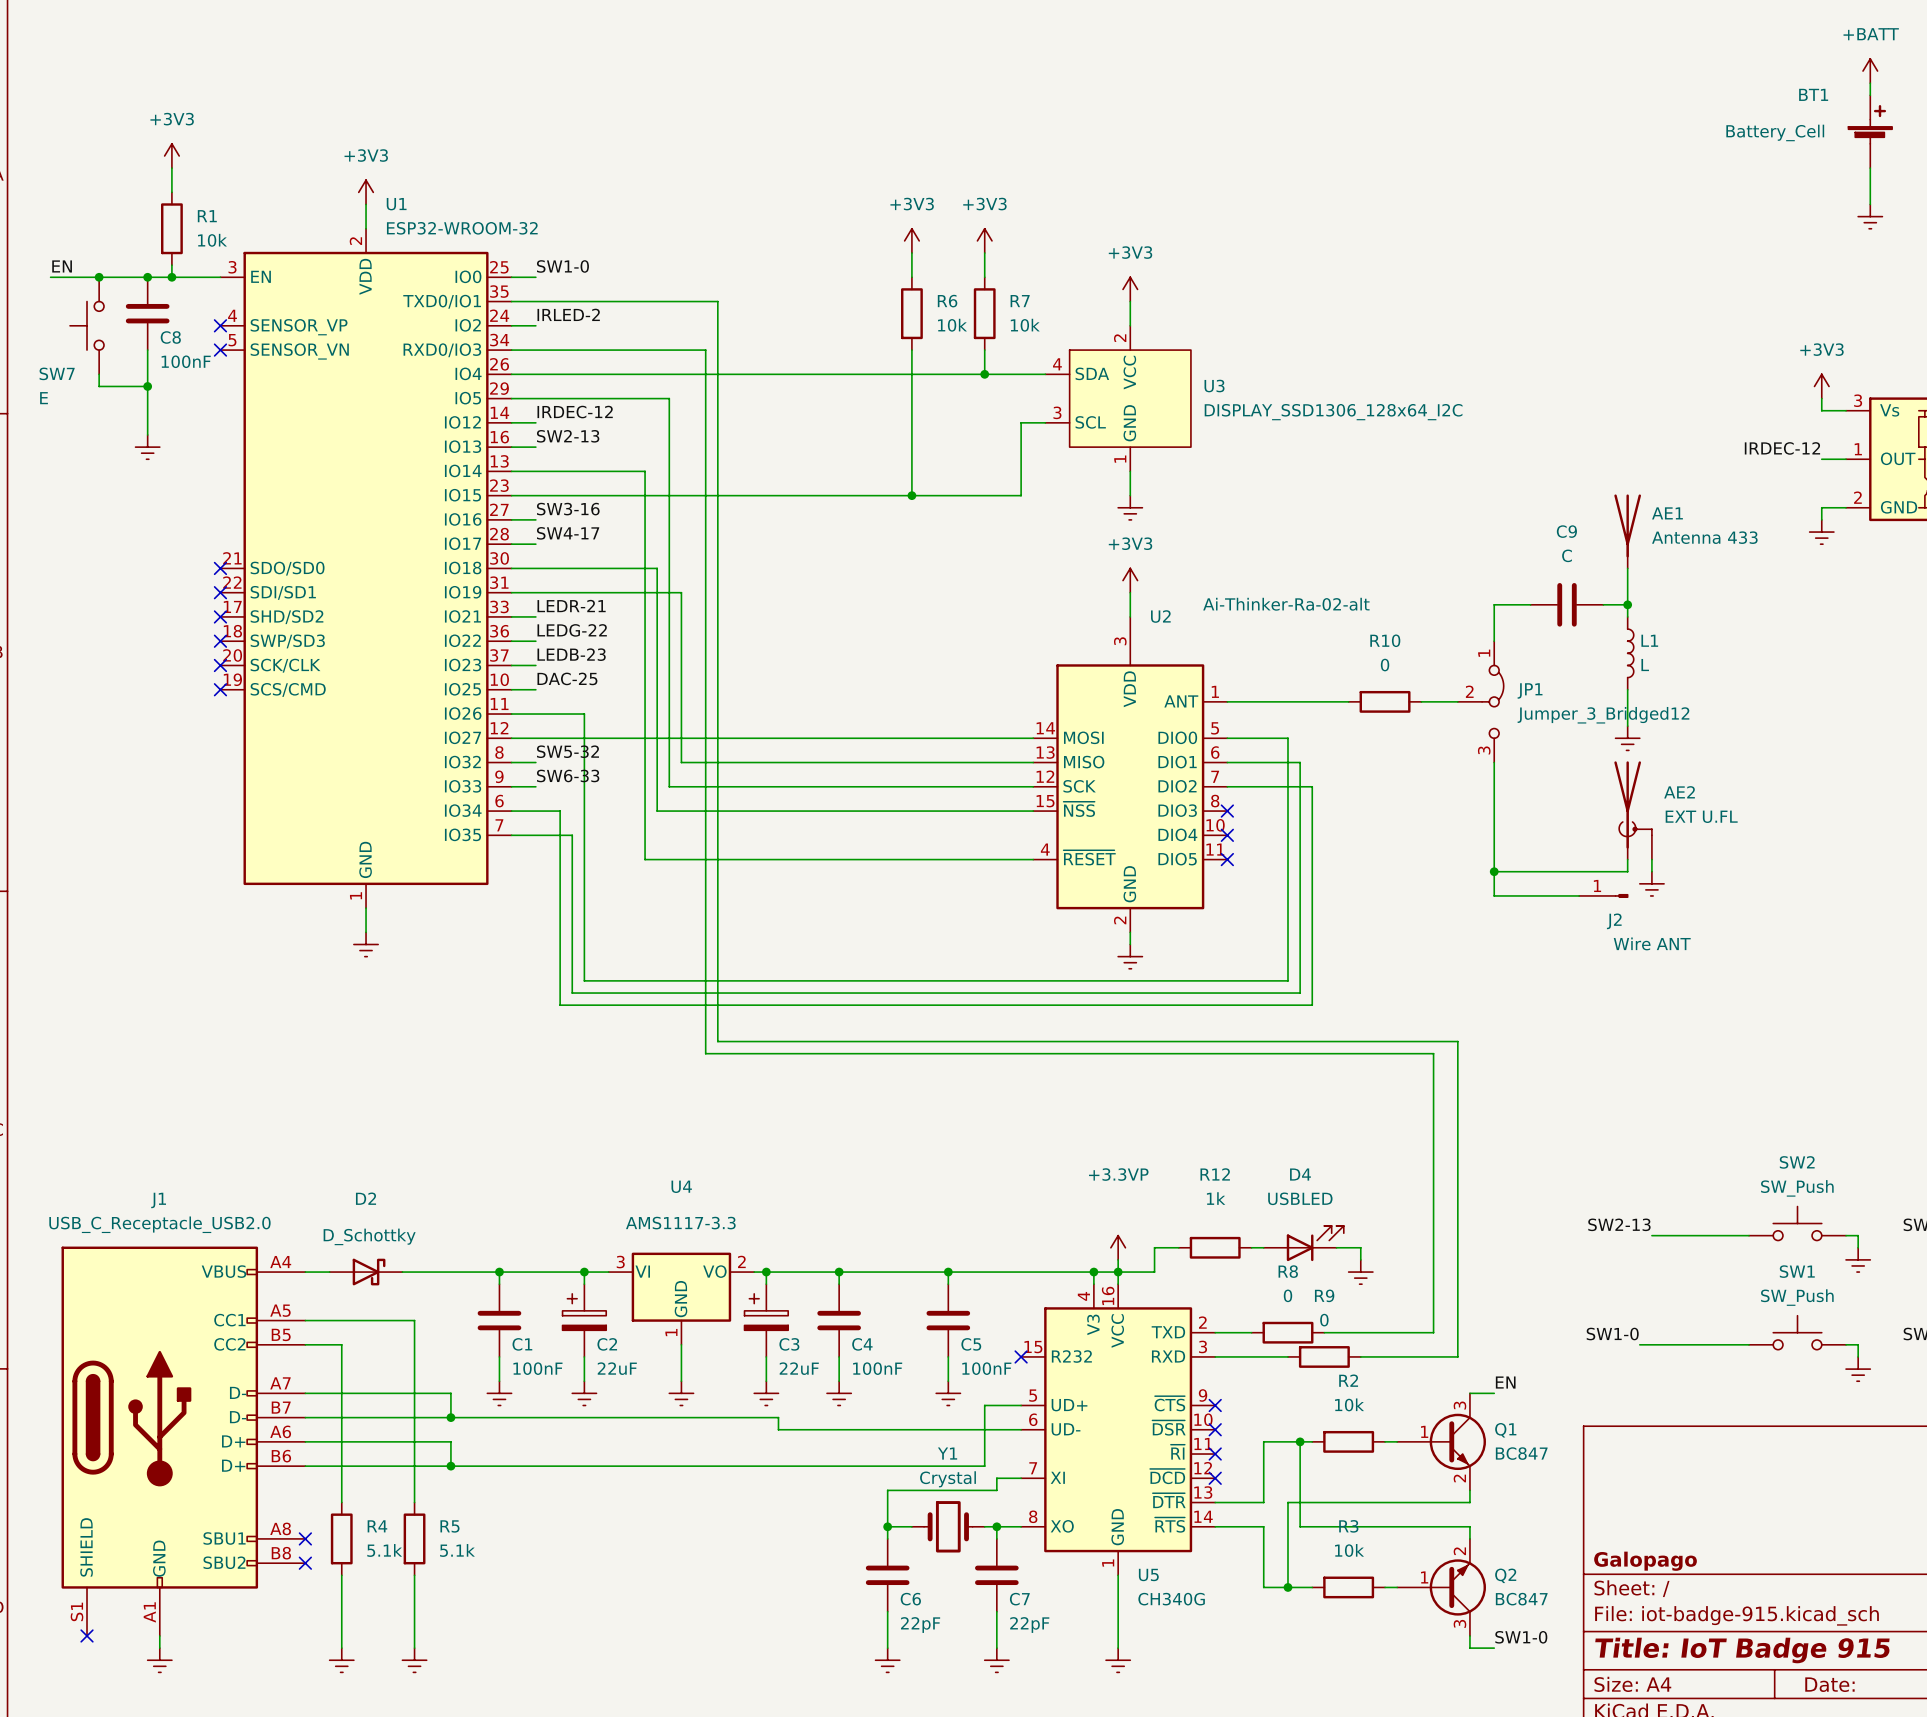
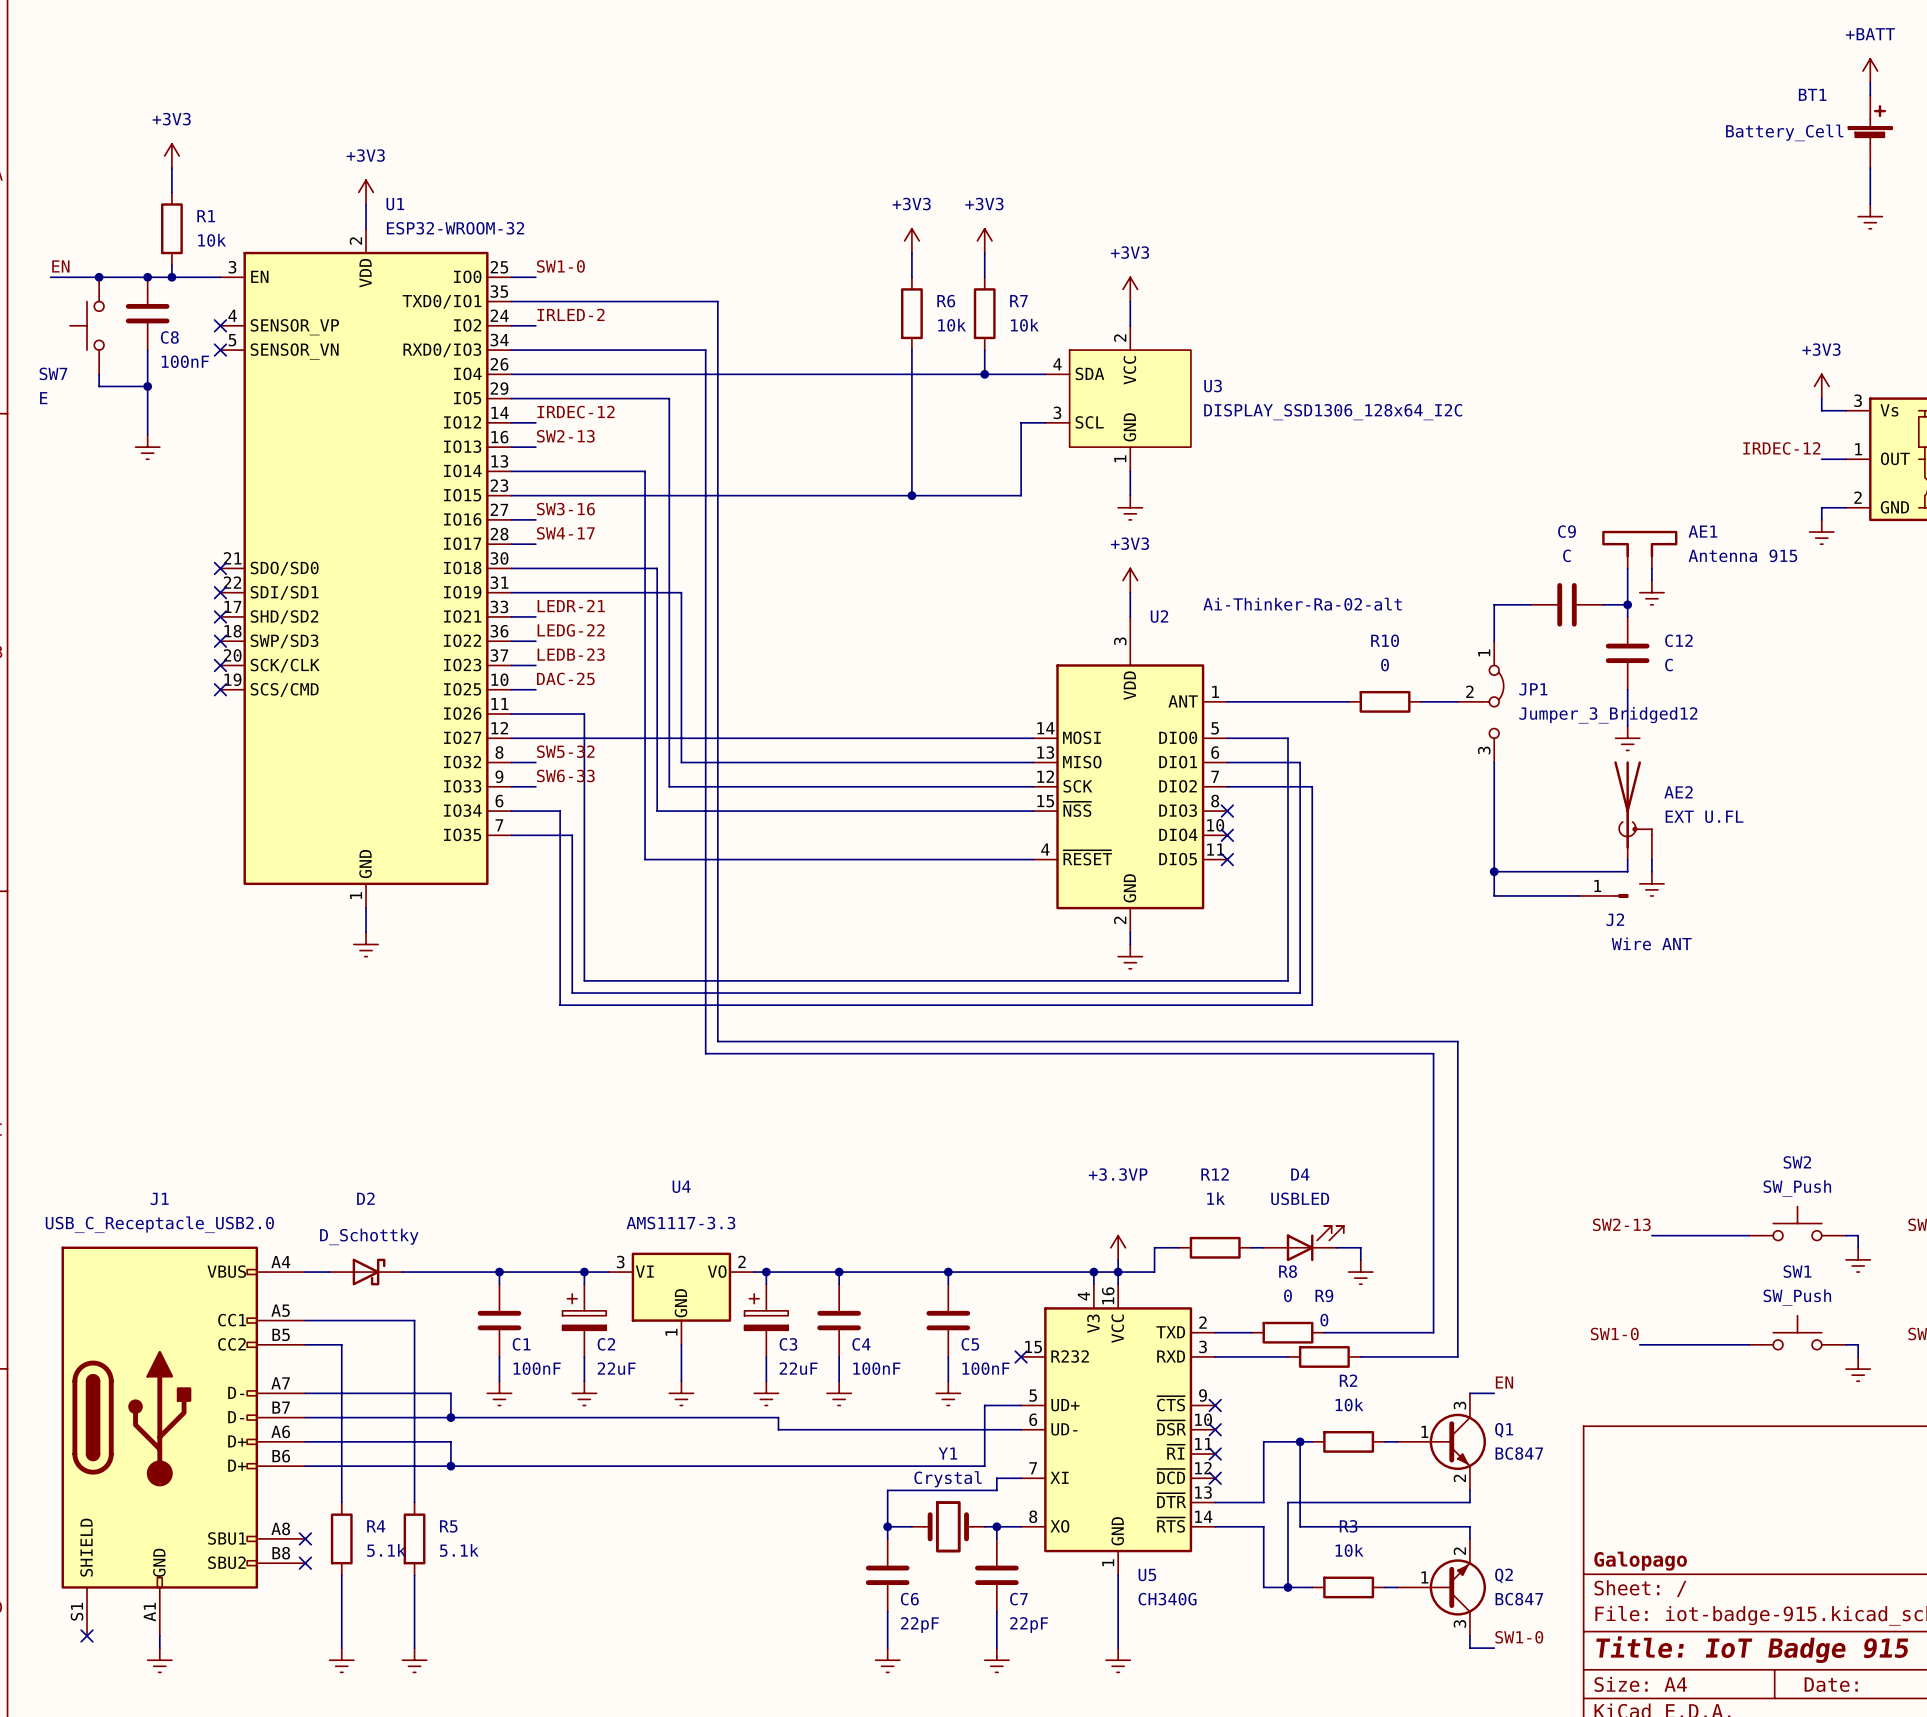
AE1 symbol: [1614, 494, 1642, 569] -> [1602, 530, 1678, 569]
AE1 name position: AE1 (1667, 513) -> AE1 (1702, 531)
AE1 value: Antenna 433 (1704, 537) -> Antenna 915 (1742, 555)
wire: none -> (1651, 568) (1651, 580)
power symbol: none -> (1651, 592)
C12: none -> C (1627, 653)
L1: L (1630, 653) -> none

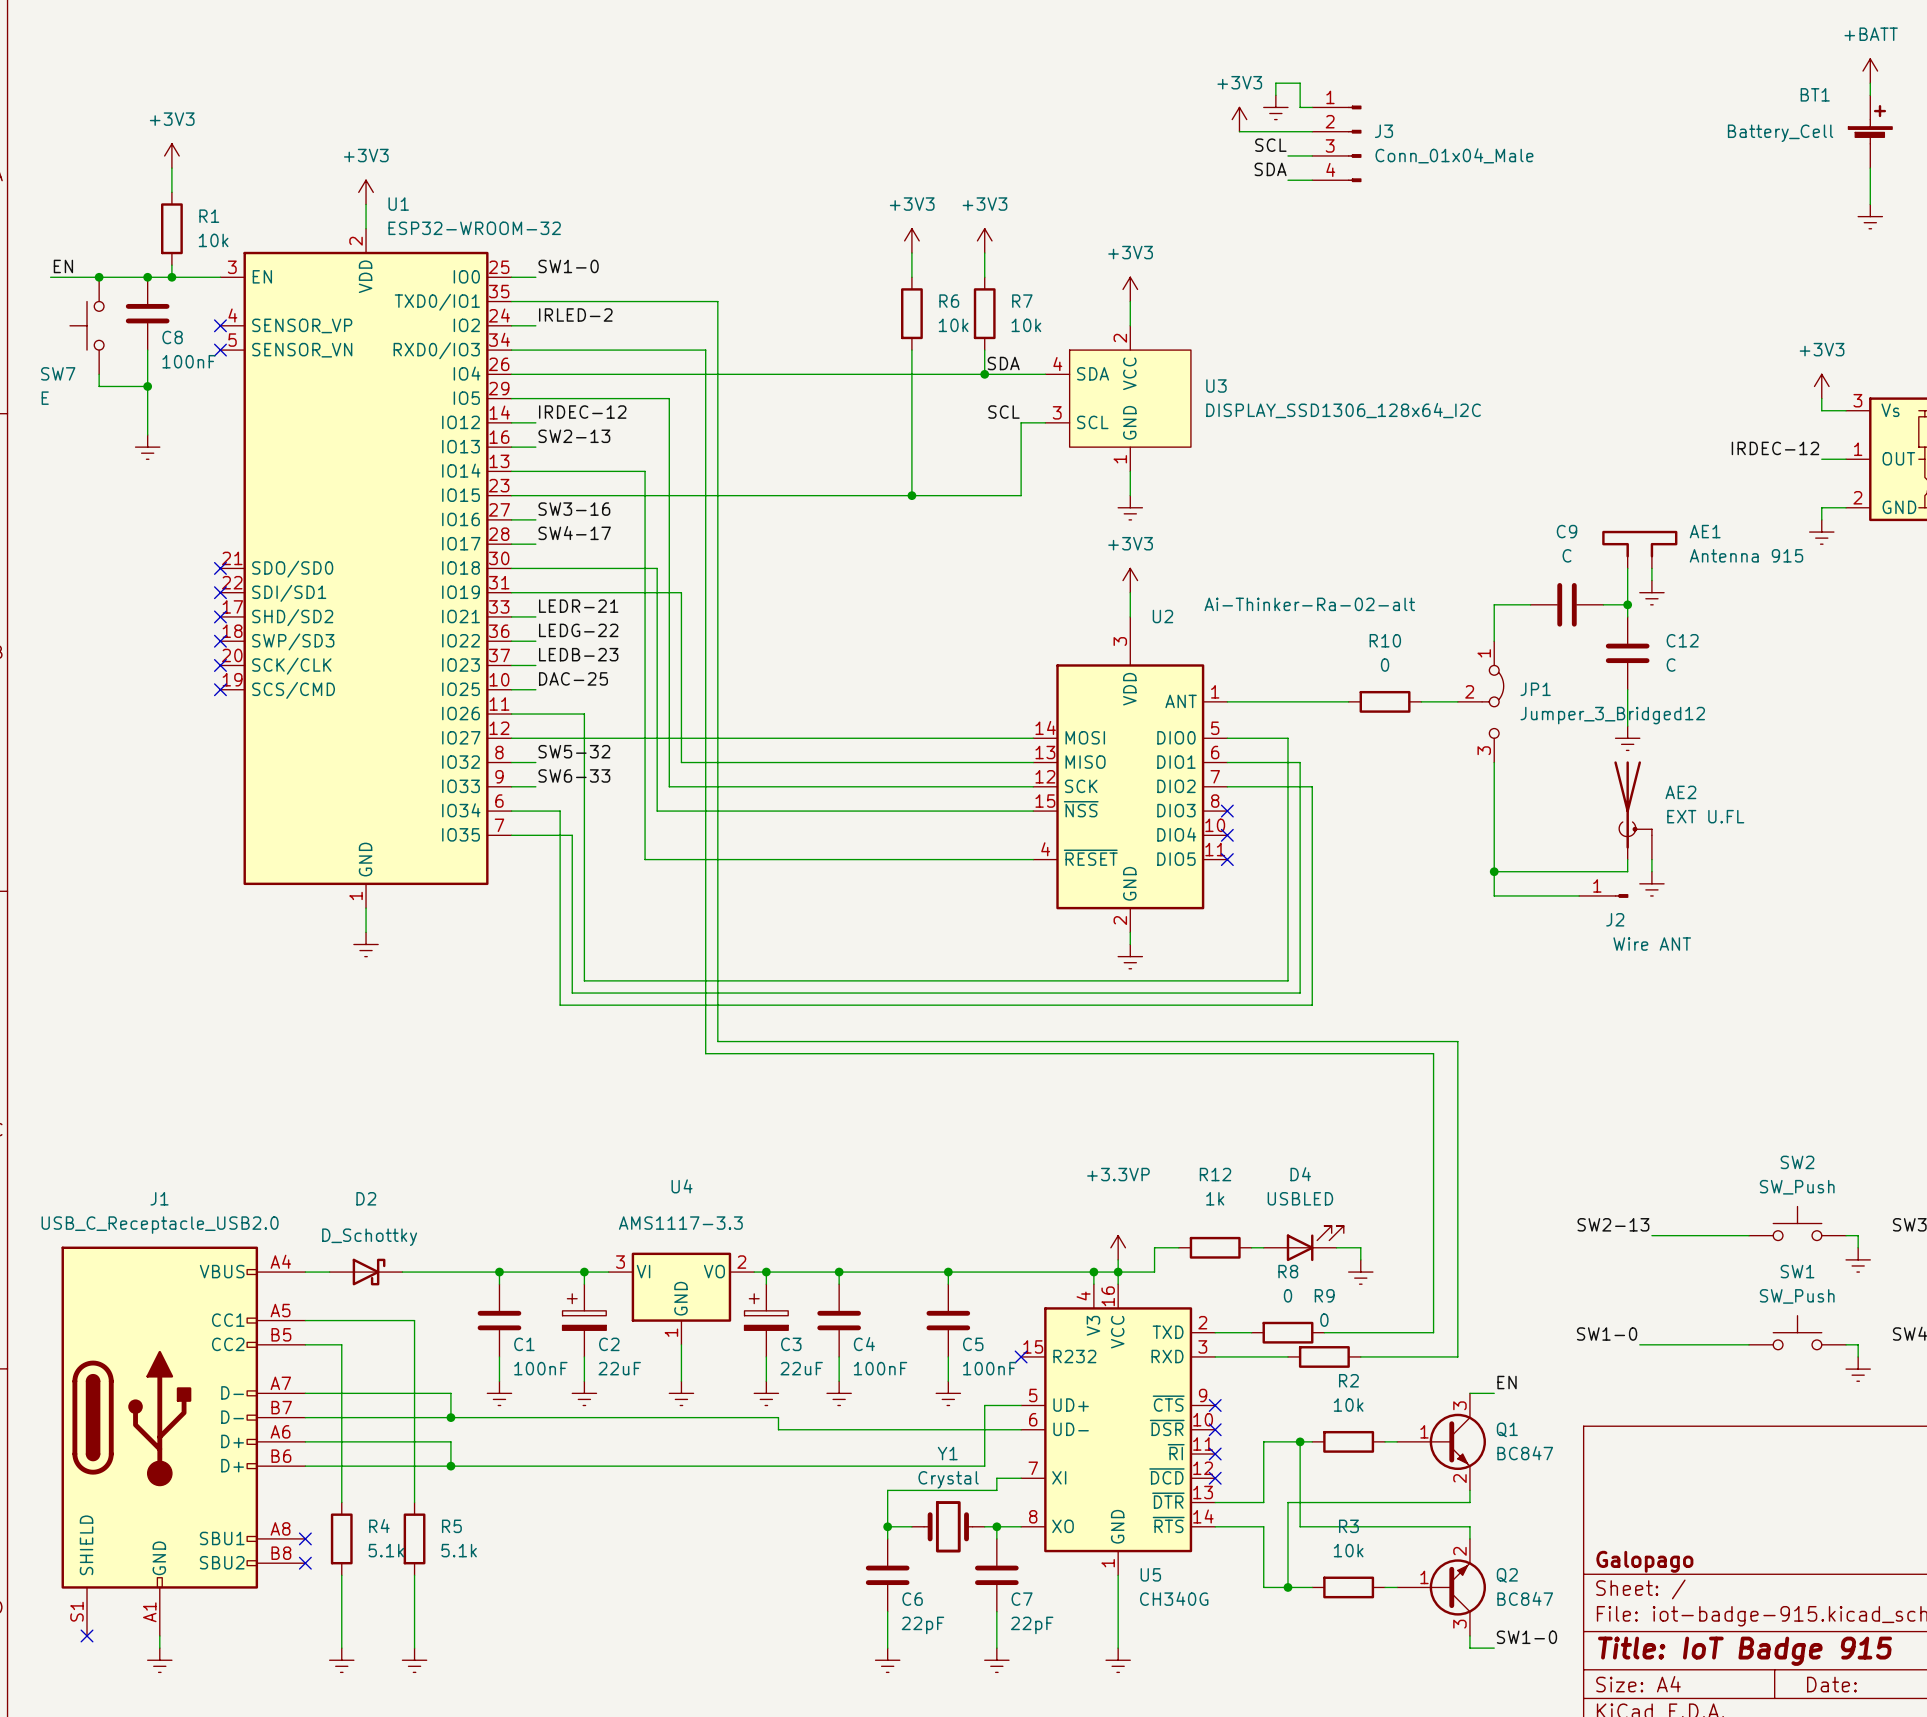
wire: none -> (1275, 95) (1275, 83) (1300, 83) (1300, 107) (1312, 107)
power symbol: none -> (1275, 107)
power symbol: none -> +3V3 (1239, 119)
wire: none -> (1239, 131) (1312, 131)
J3: none -> Conn_01x04_Male (1336, 143)
label: none -> SCL (1270, 145)
wire: none -> (1287, 155) (1312, 155)
label: none -> SDA (1270, 169)
wire: none -> (1287, 180) (1312, 180)
label: none -> SDA (1003, 363)
label: none -> SCL (1003, 412)

